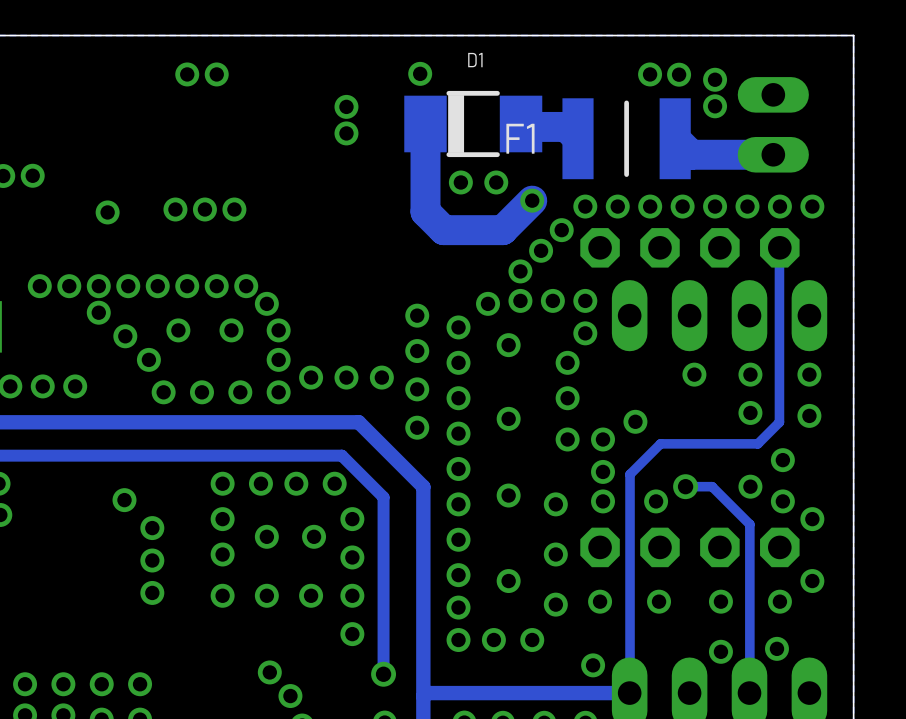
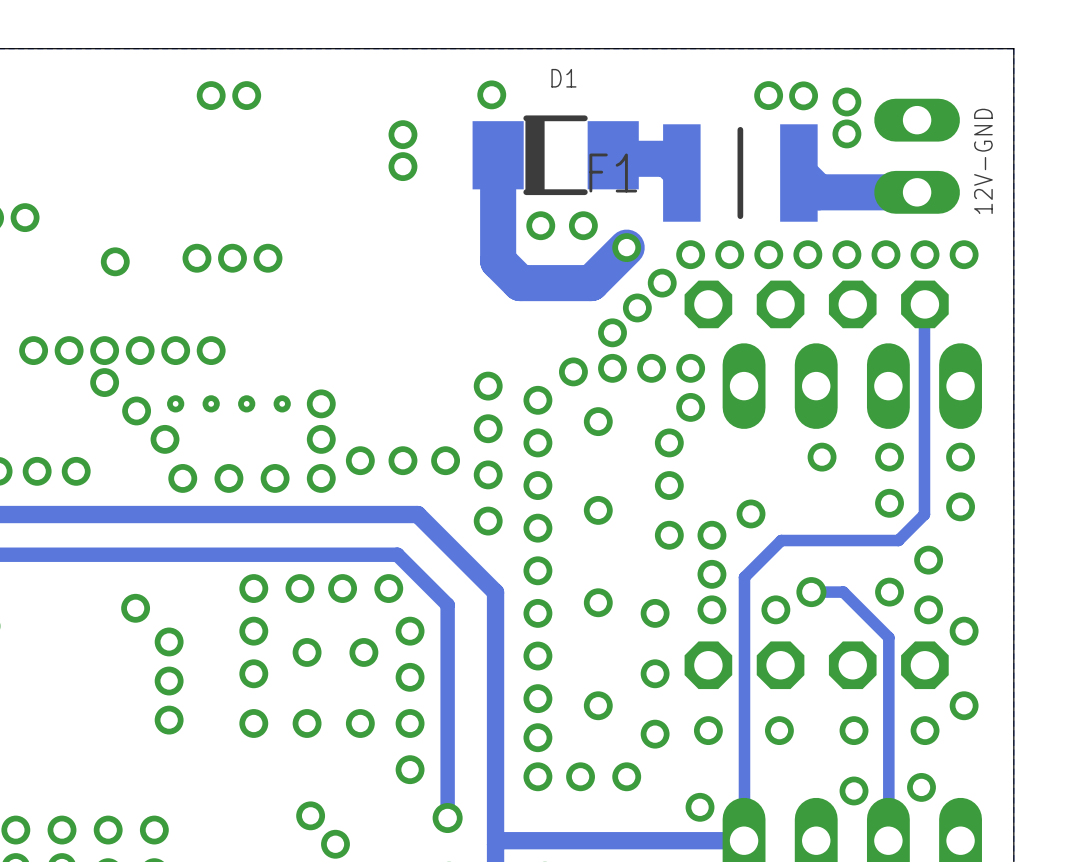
text: none -> 12V-GND (983, 161)
via: (216, 286) -> none
via: (246, 286) -> none
via: (266, 303) -> none
via size: [166, 318, 191, 343] -> [202, 395, 220, 413]
via: none -> (175, 403)
via: none -> (246, 403)
via: (231, 330) -> none
via: none -> (282, 403)

